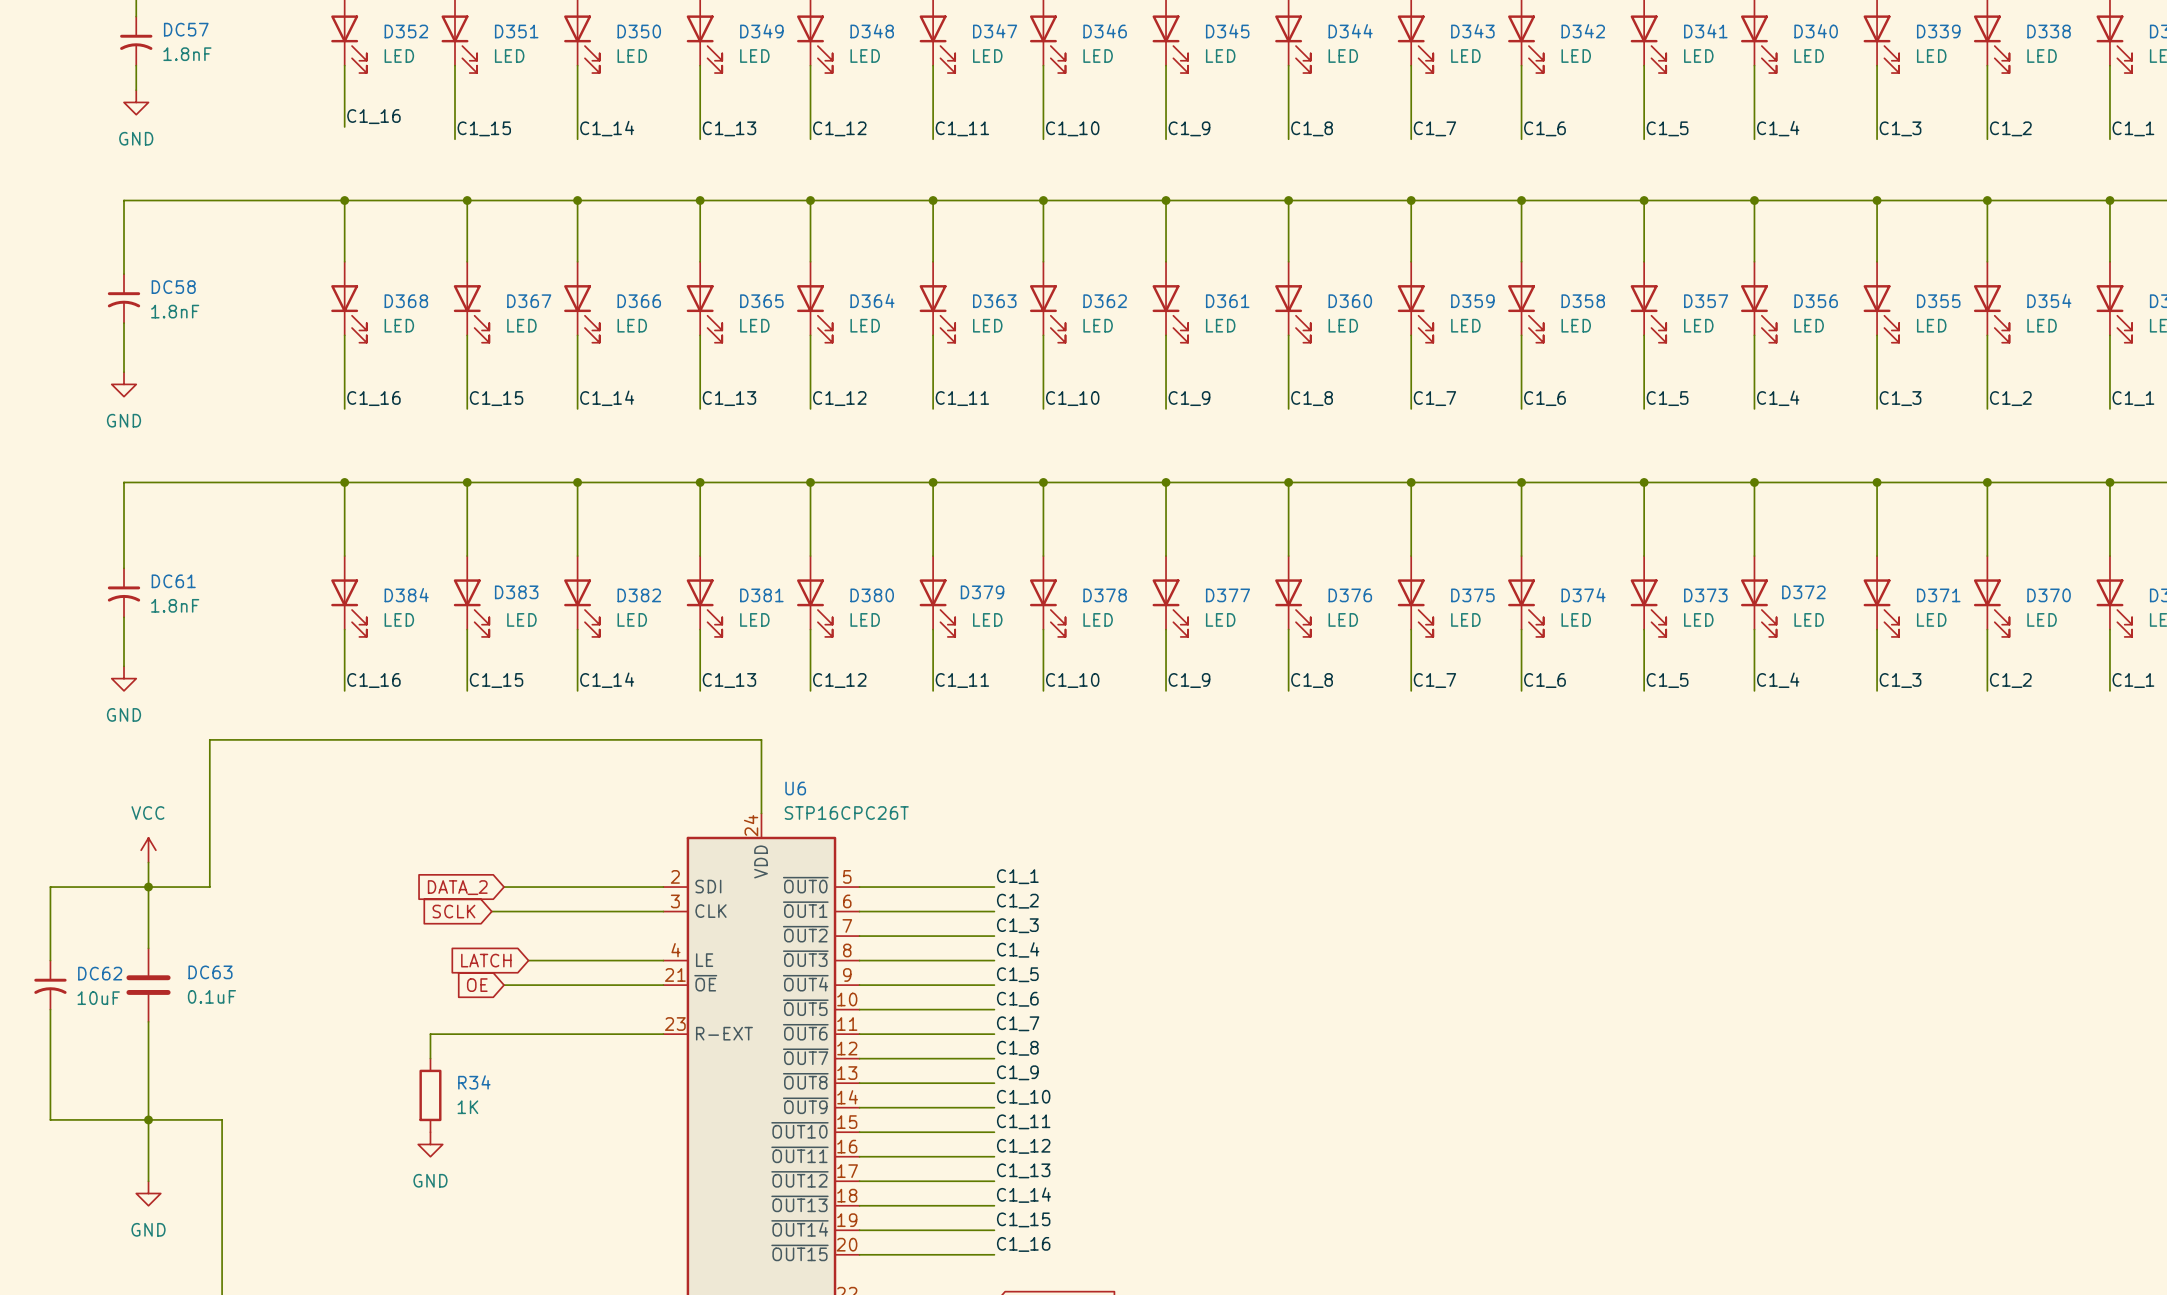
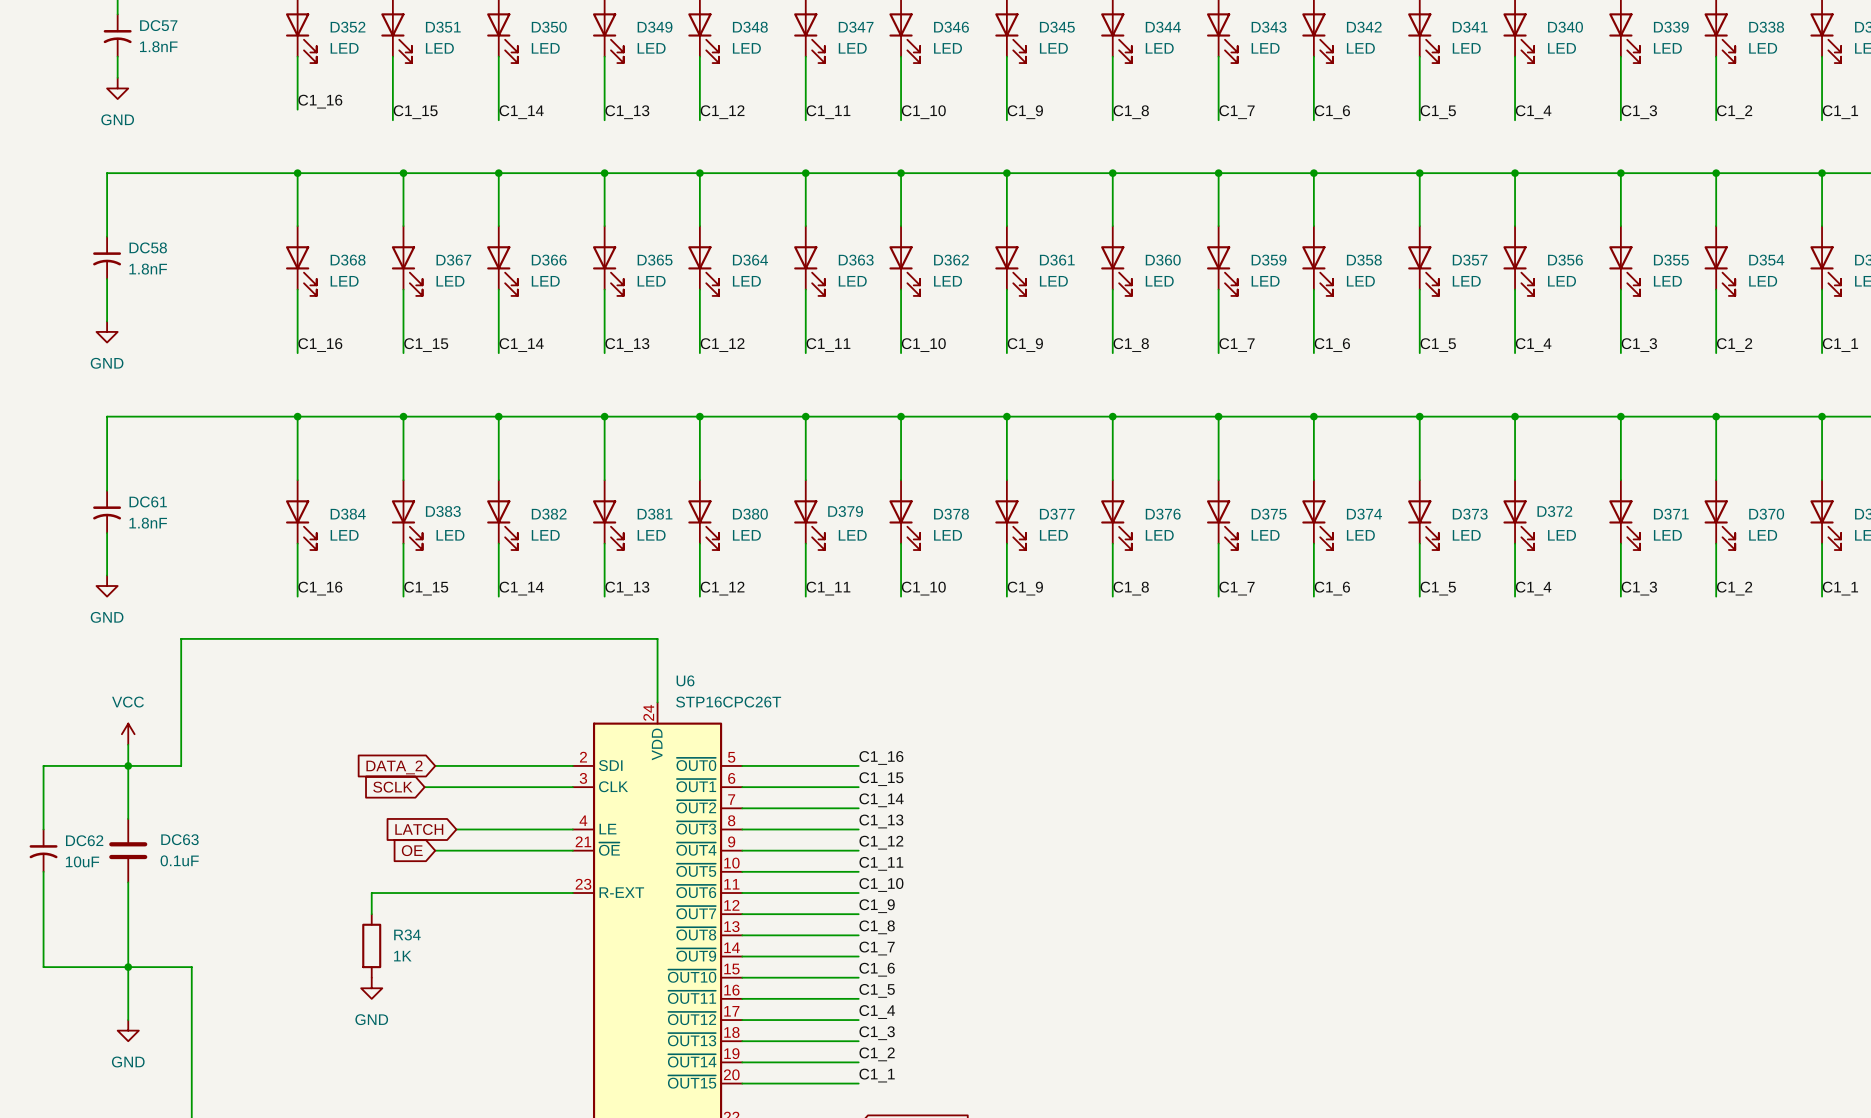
label: C1_1 (1017, 876) -> C1_16 (881, 757)
label: C1_2 (1017, 901) -> C1_15 (881, 779)
label: C1_3 (1017, 925) -> C1_14 (881, 800)
label: C1_4 (1018, 949) -> C1_13 (881, 821)
label: C1_5 (1017, 974) -> C1_12 (881, 842)
label: C1_6 (1017, 999) -> C1_11 (881, 863)
label: C1_7 (1018, 1023) -> C1_10 (881, 885)
label: C1_8 (1017, 1048) -> C1_9 (877, 906)
label: C1_9 (1017, 1072) -> C1_8 (877, 927)
label: C1_10 (1023, 1097) -> C1_7 (877, 948)
label: C1_11 (1023, 1121) -> C1_6 (877, 969)
label: C1_12 (1023, 1146) -> C1_5 (877, 990)
label: C1_13 (1023, 1170) -> C1_4 (877, 1012)
label: C1_14 (1023, 1195) -> C1_3 (877, 1033)
label: C1_15 (1023, 1219) -> C1_2 (877, 1054)
label: C1_16 (1023, 1244) -> C1_1 (877, 1075)

